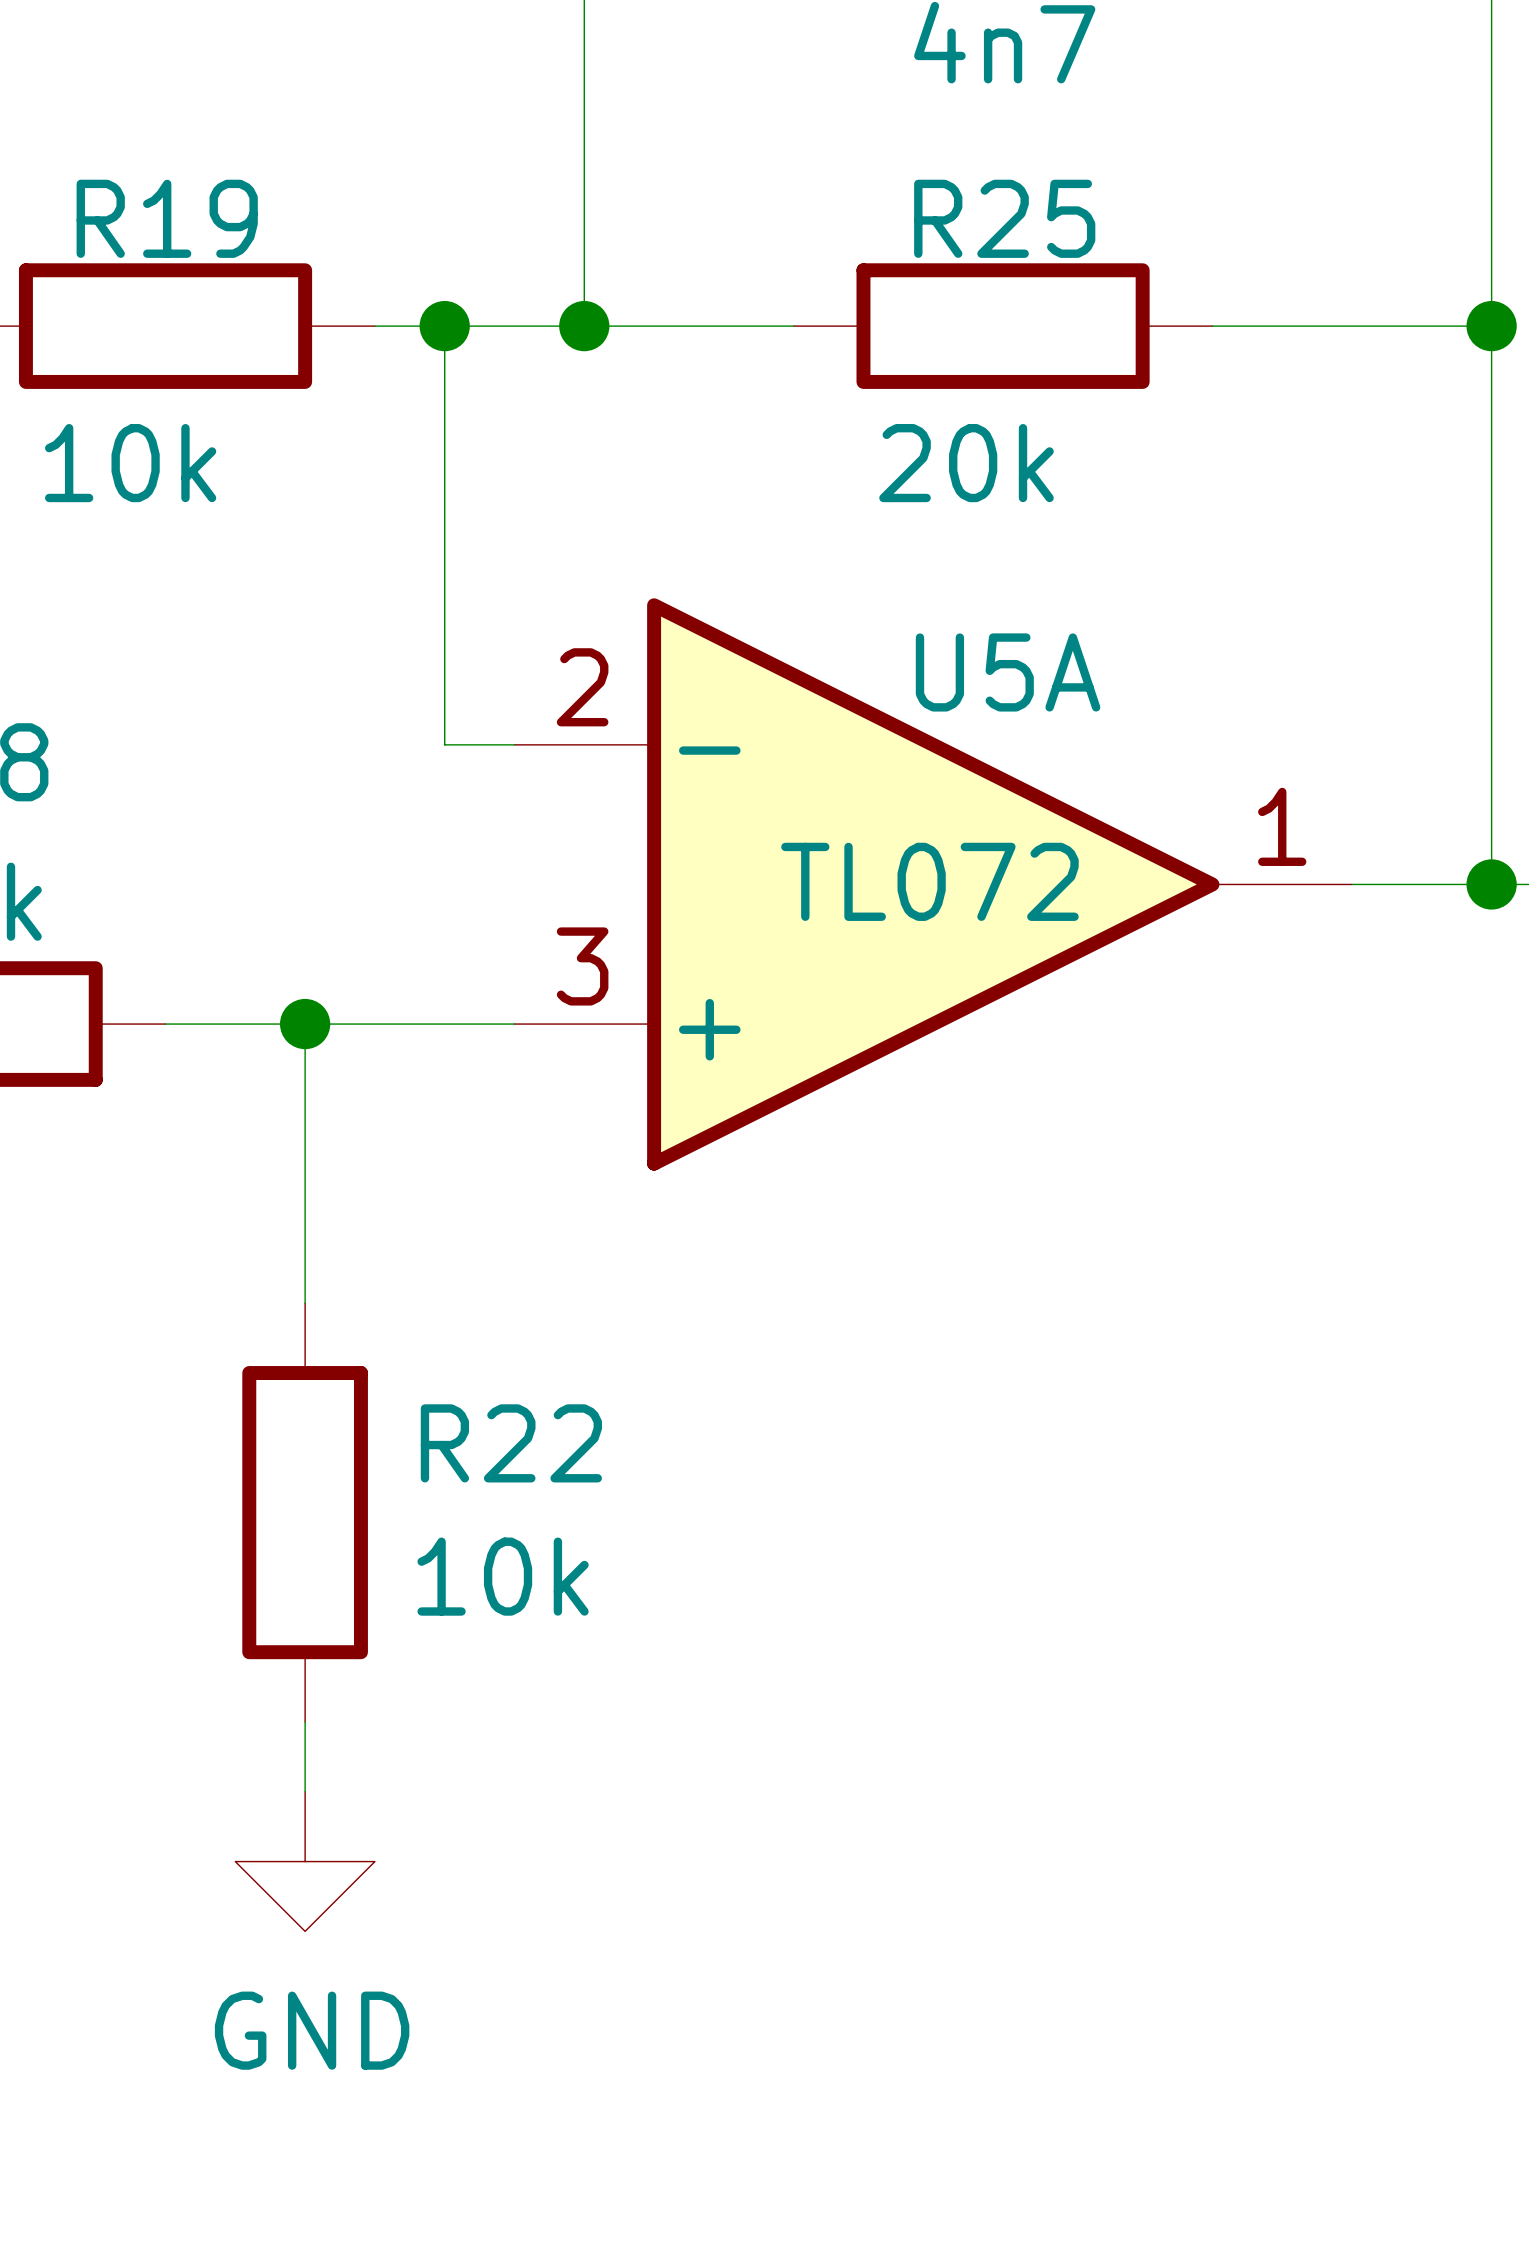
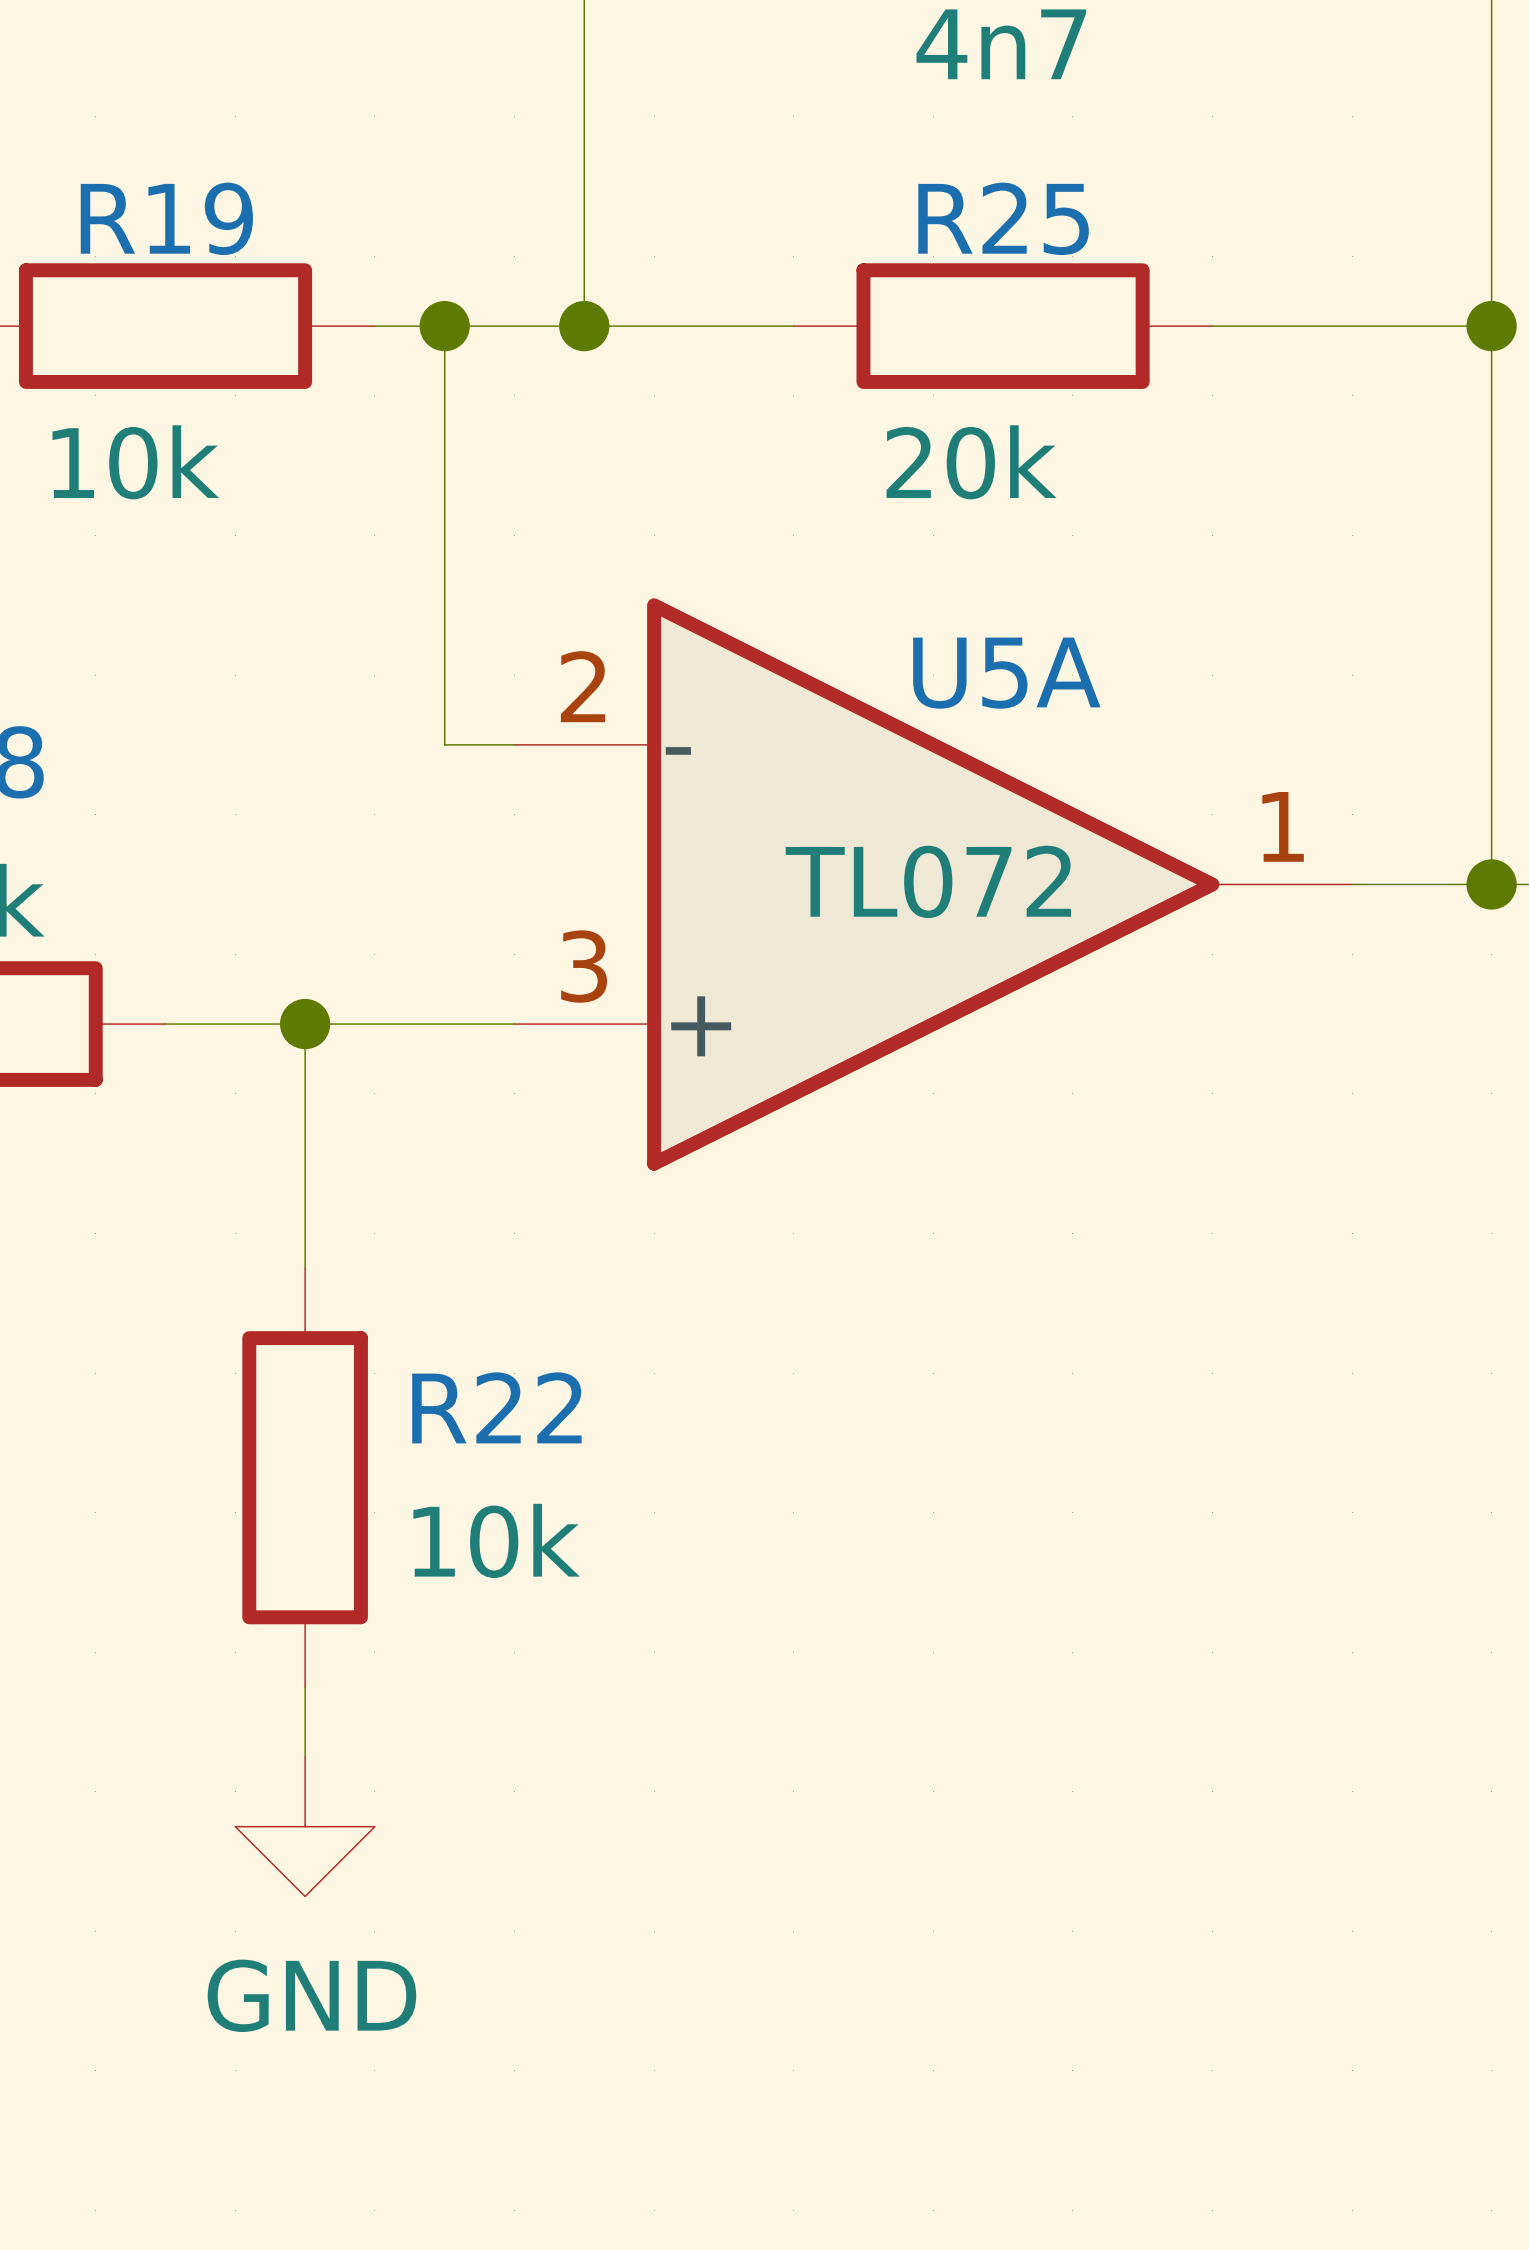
R22 position: (305, 1512) -> (305, 1477)
power symbol position: GND (305, 1861) -> GND (305, 1826)

